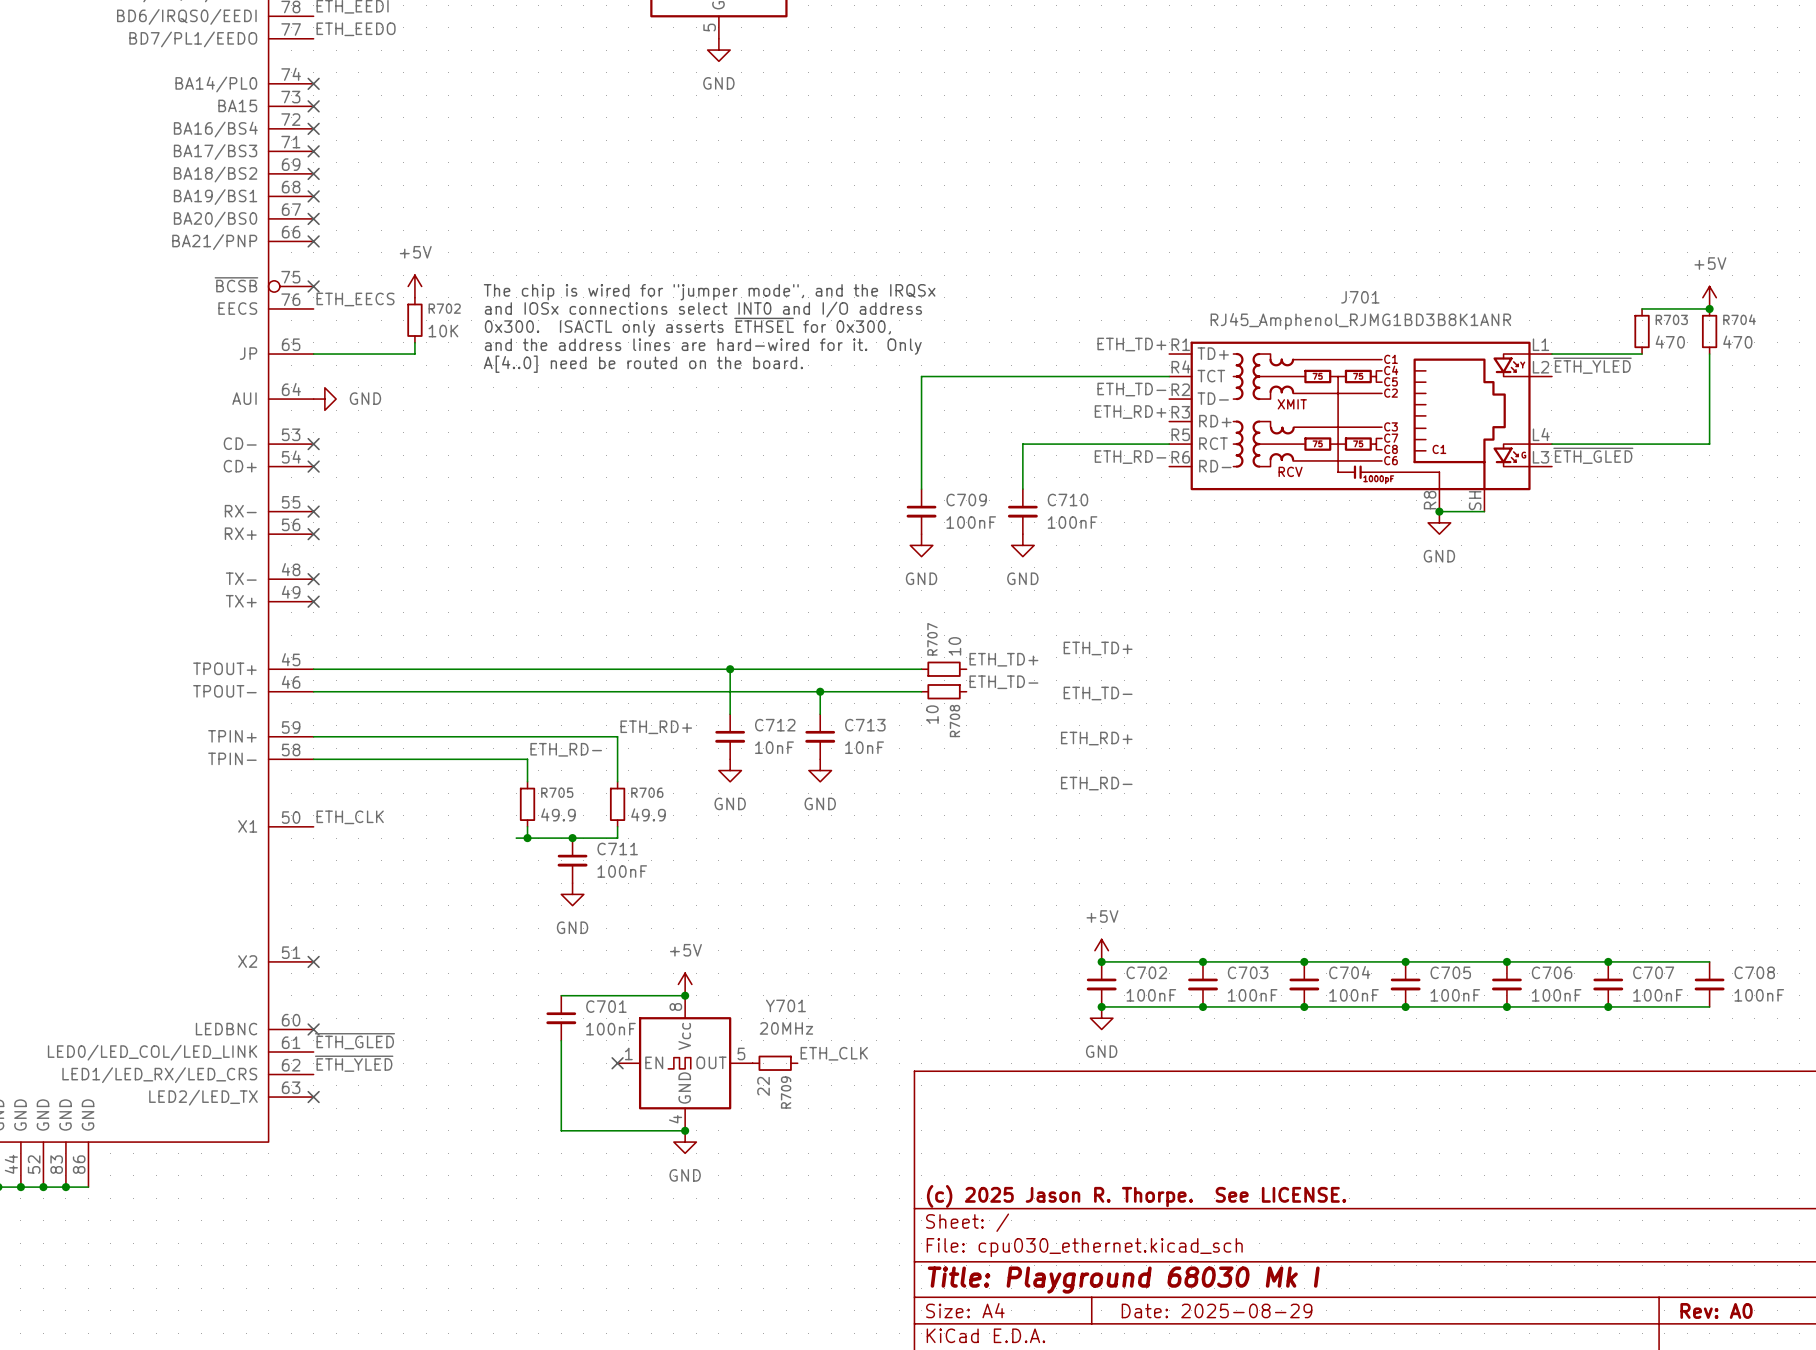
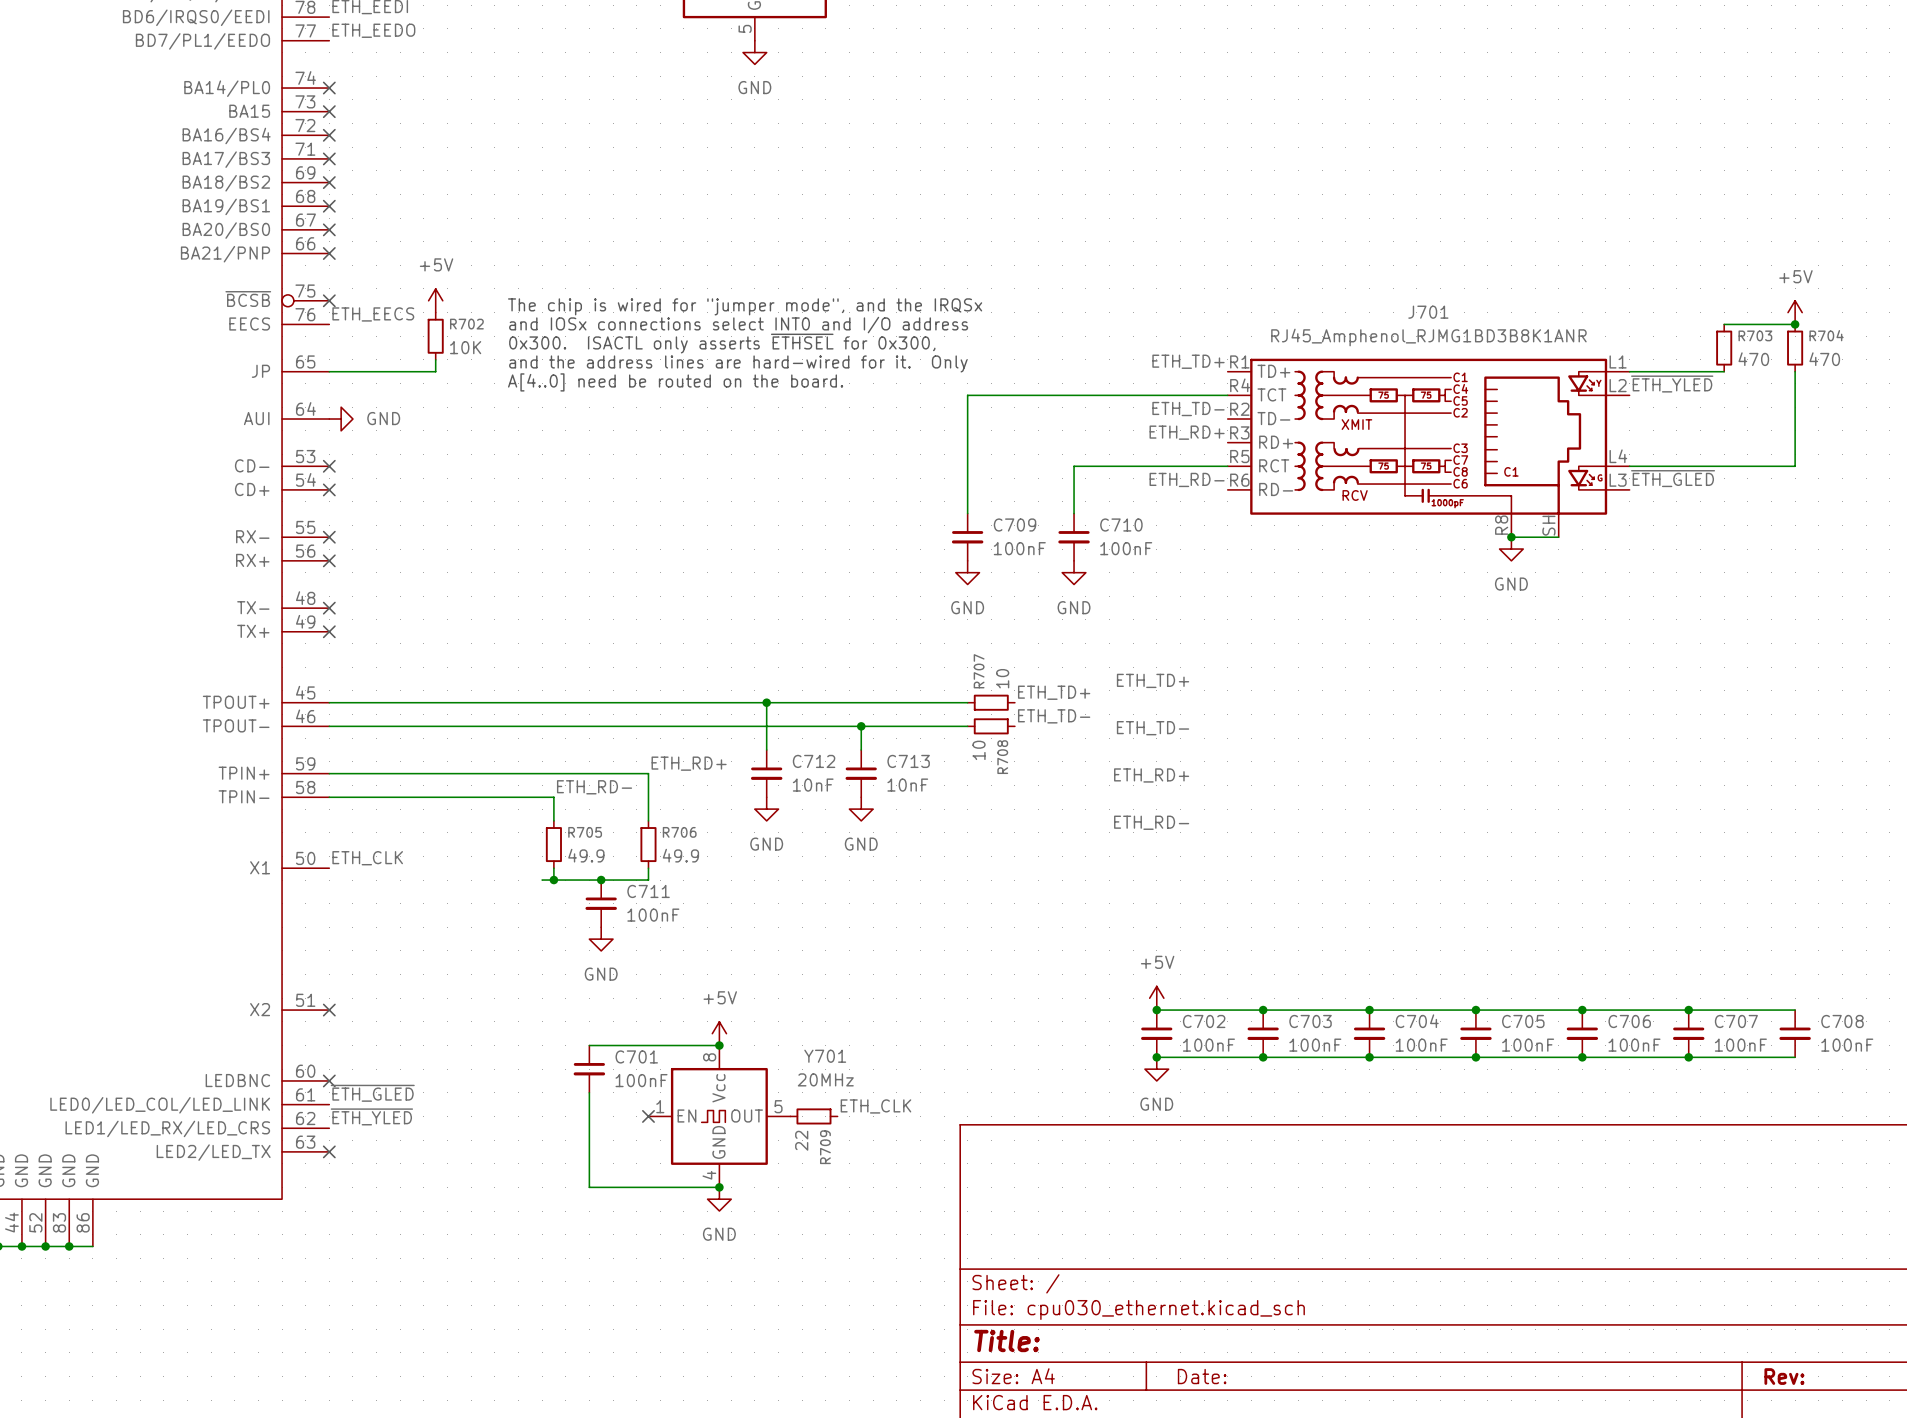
title block: (c) 2025 Jason R. Thorpe. See LICENSE. (1136, 1196) -> none
title block: Title: Playground 68030 Mk I (1123, 1280) -> Title: (1007, 1340)
title block: Date: 2025-08-29 (1217, 1310) -> Date: (1202, 1376)
title block: Rev: A0 (1716, 1310) -> Rev: (1784, 1376)

